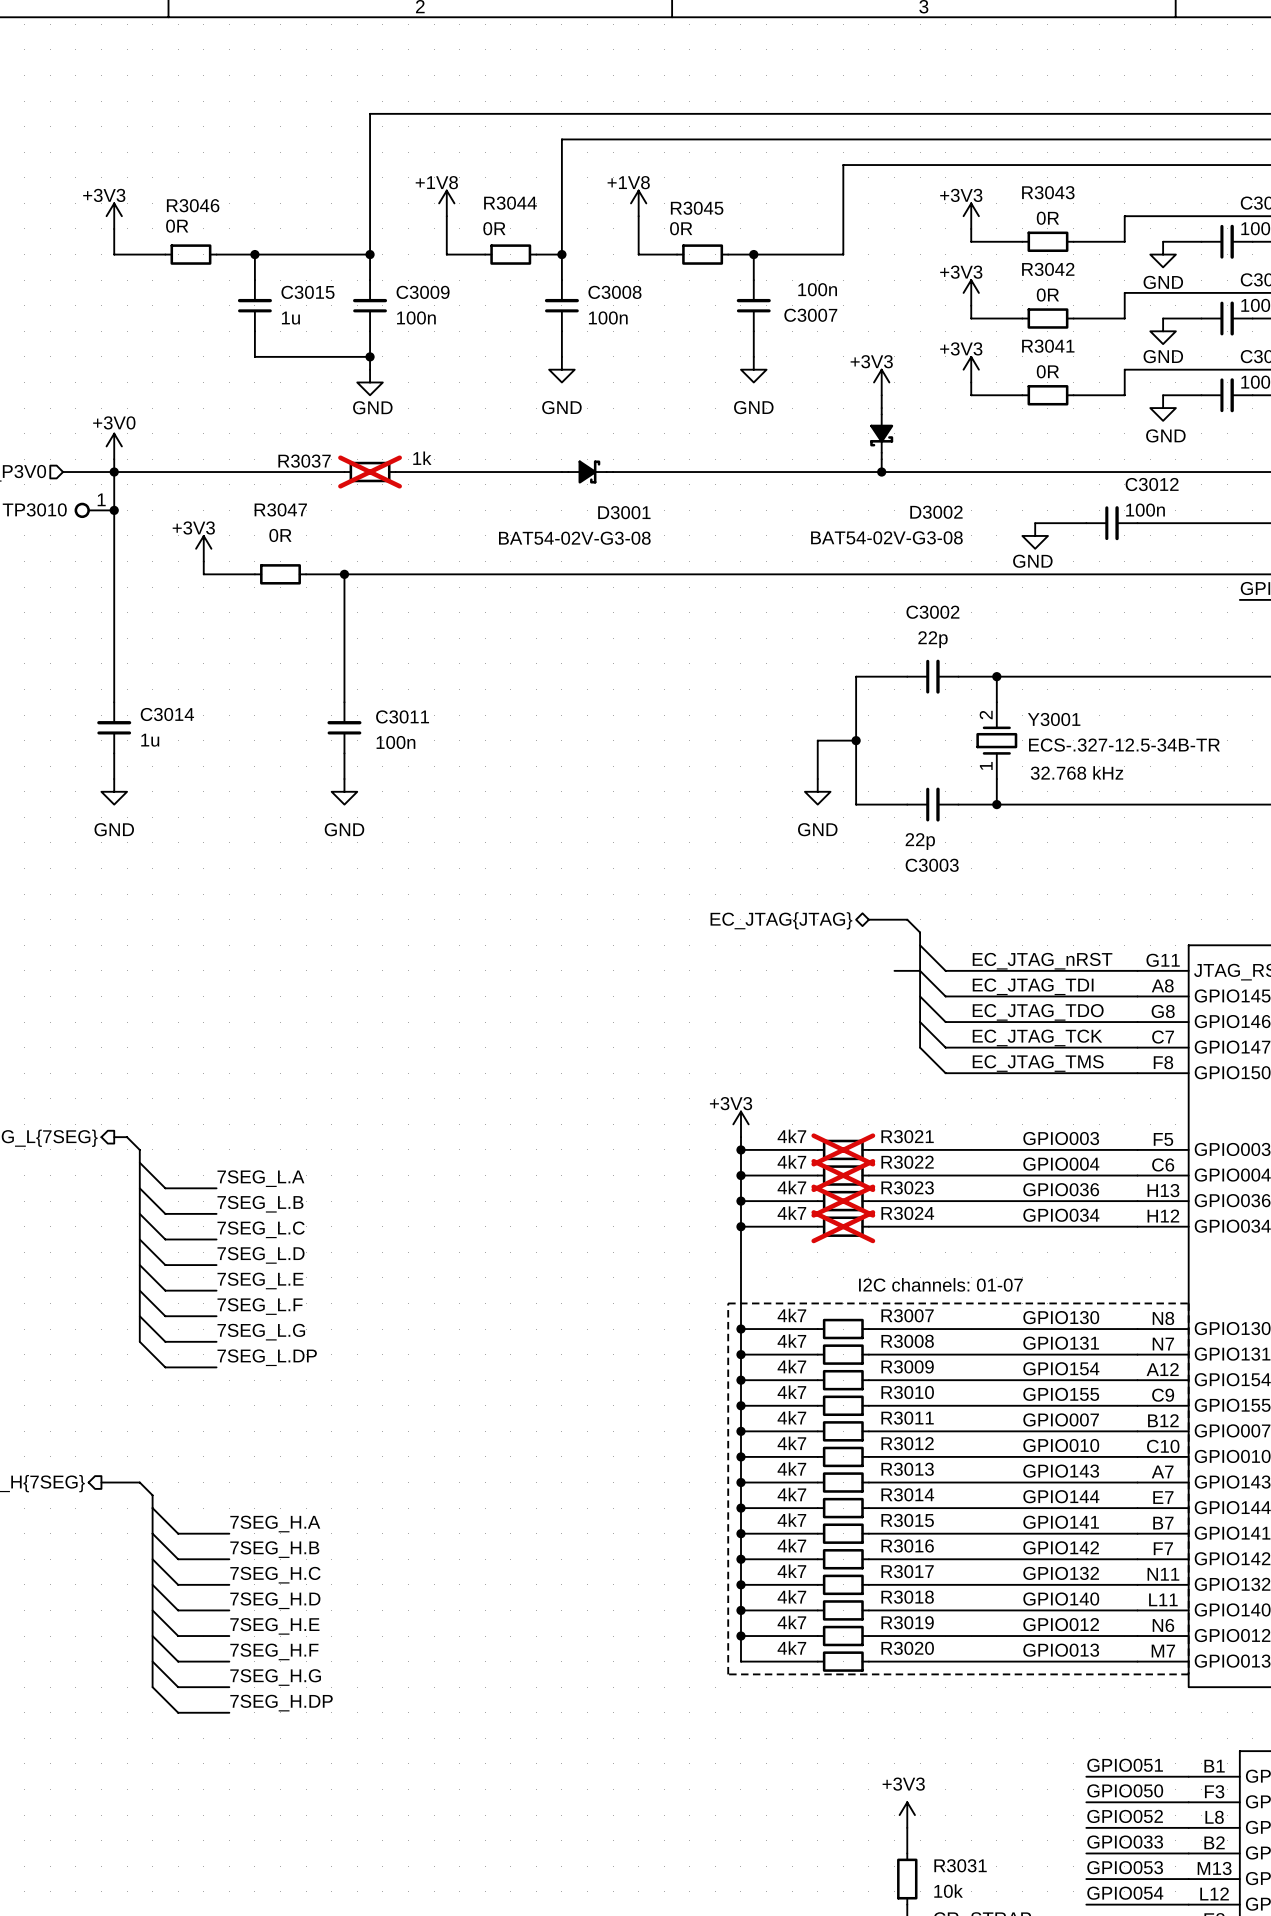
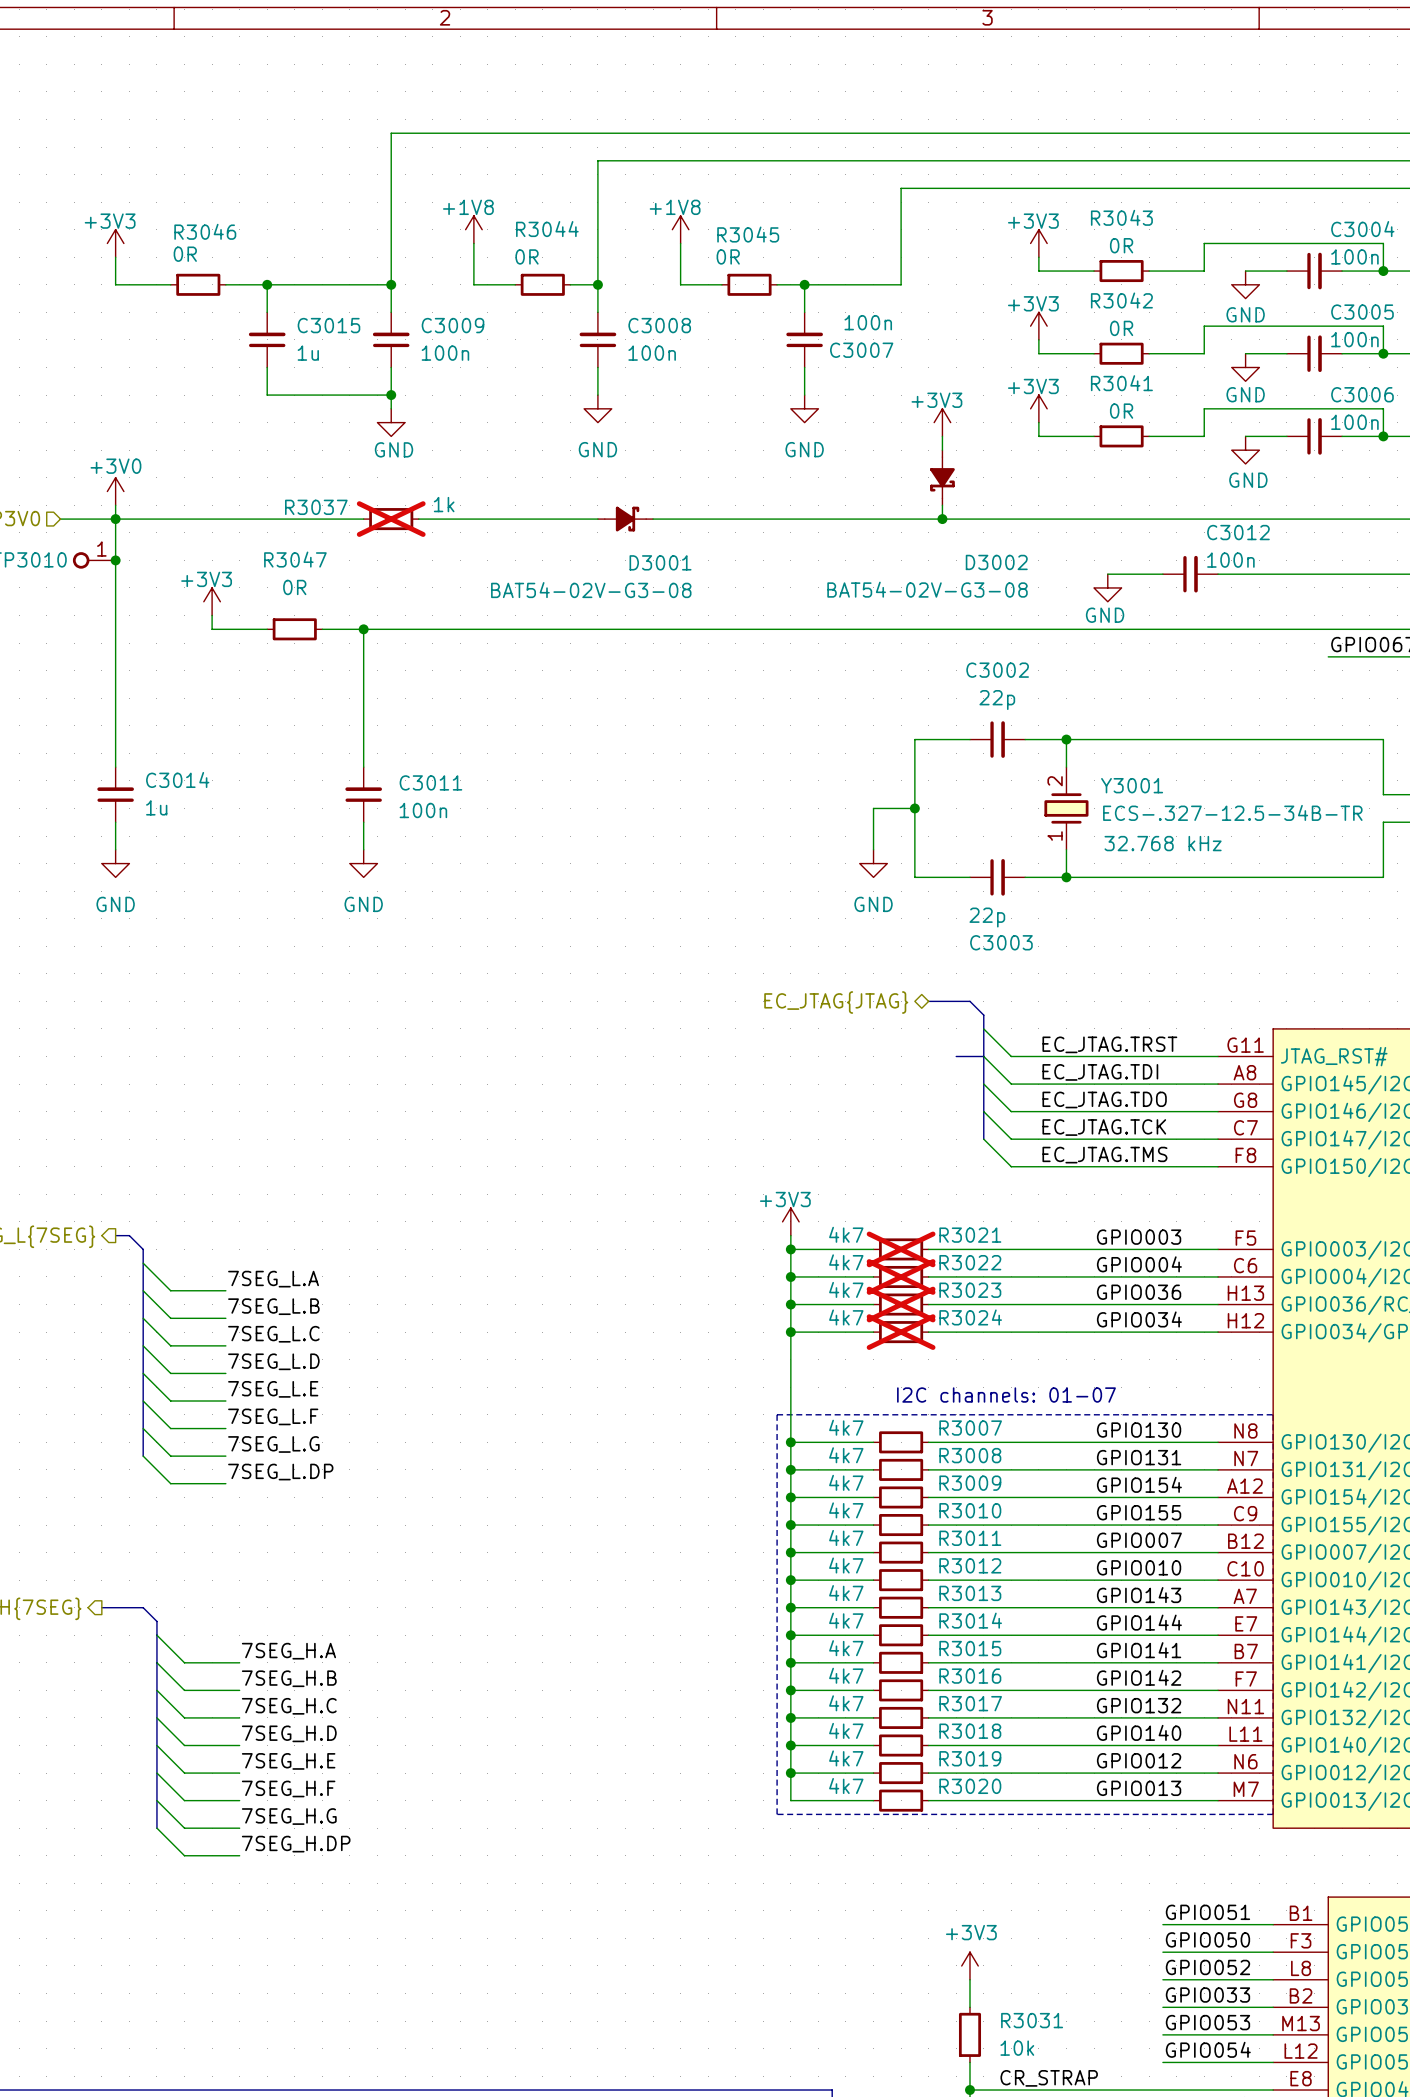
label: EC_JTAG_nRST (1042, 961) -> EC_JTAG.TRST (1109, 1044)
label: EC_JTAG_TDI (1033, 986) -> EC_JTAG.TDI (1100, 1072)
label: EC_JTAG_TDO (1038, 1012) -> EC_JTAG.TDO (1104, 1099)
label: EC_JTAG_TCK (1037, 1037) -> EC_JTAG.TCK (1104, 1127)
label: EC_JTAG_TMS (1038, 1063) -> EC_JTAG.TMS (1104, 1155)

